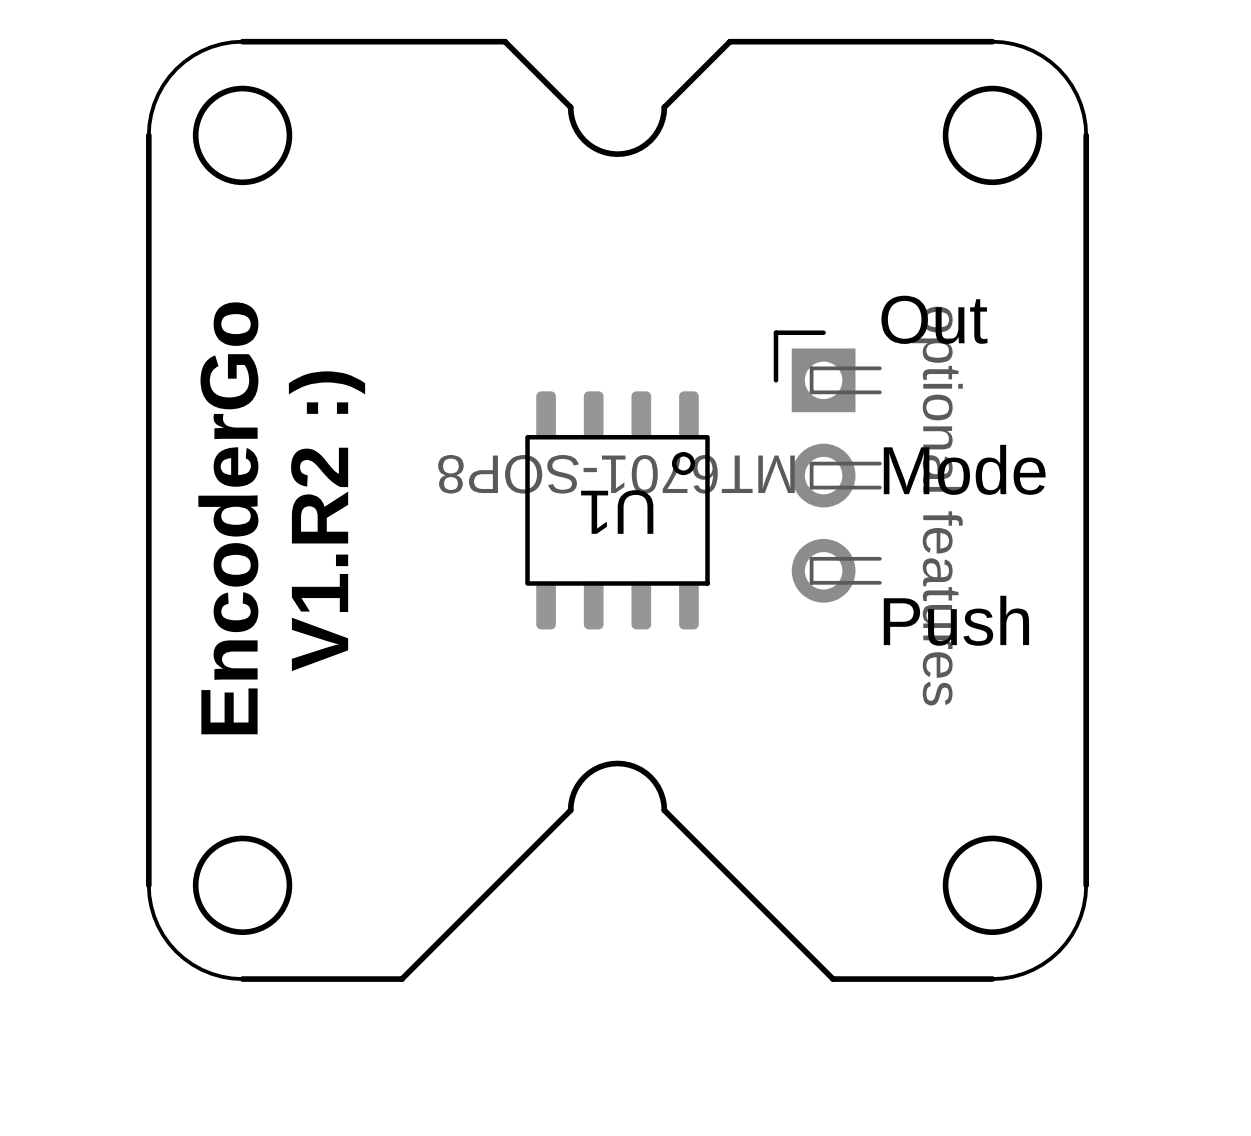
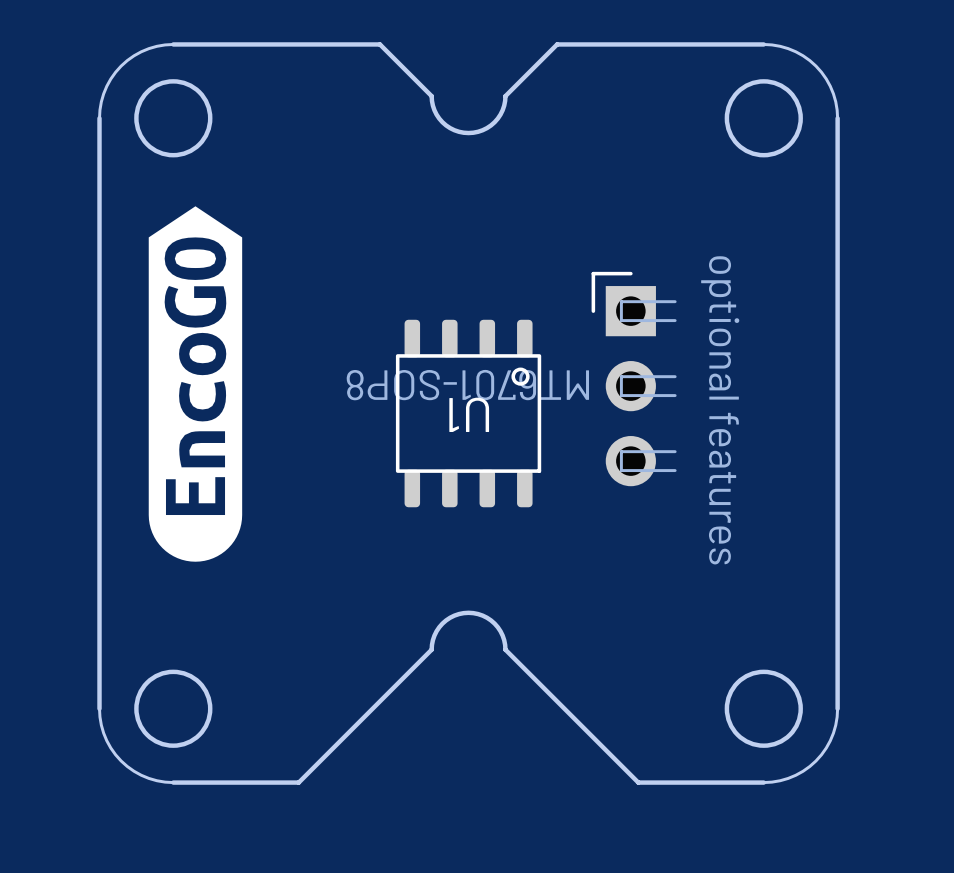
drawing: none -> [148, 206, 243, 562]
text: Out (934, 319) -> none
text: Mode (964, 469) -> none
text: EncoderGo (228, 518) -> none
text: V1.R2 :) (327, 521) -> none
text: Push (956, 620) -> none

